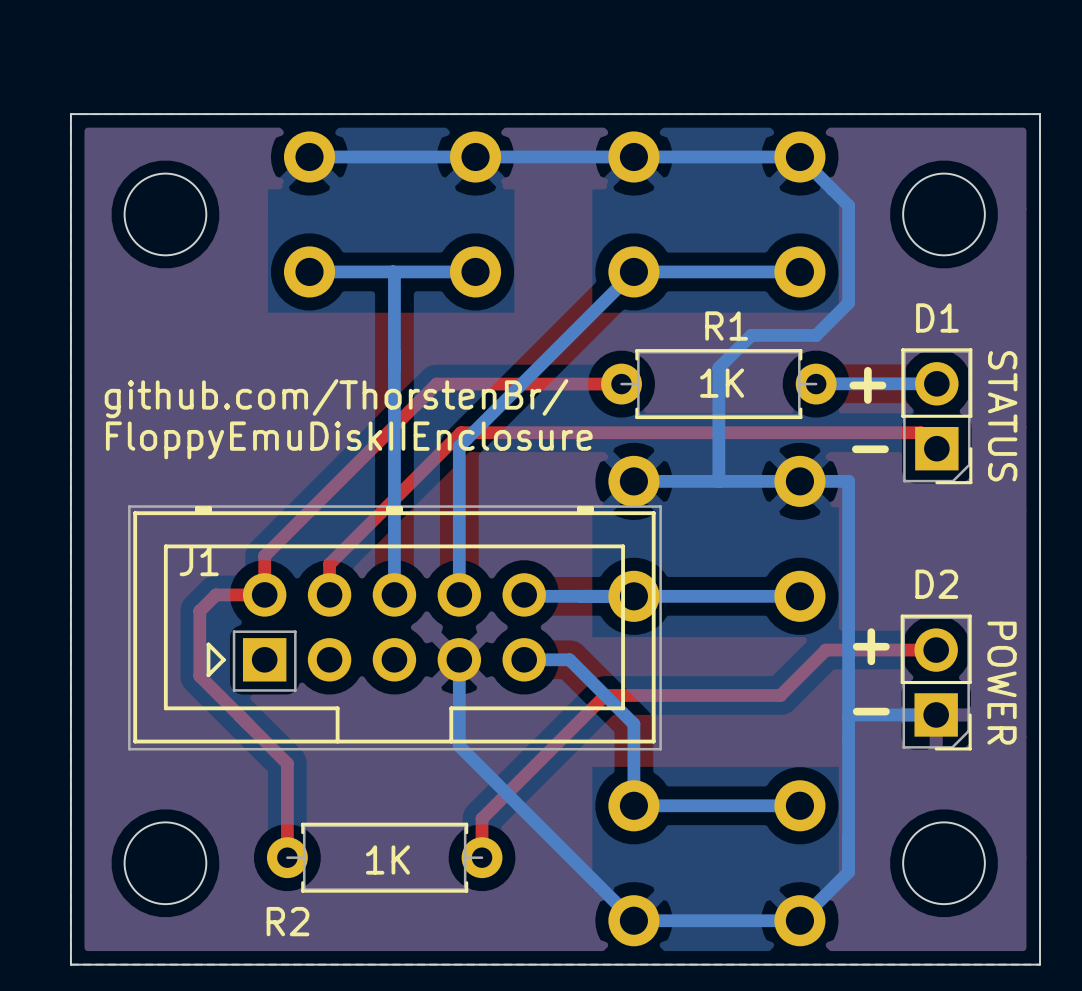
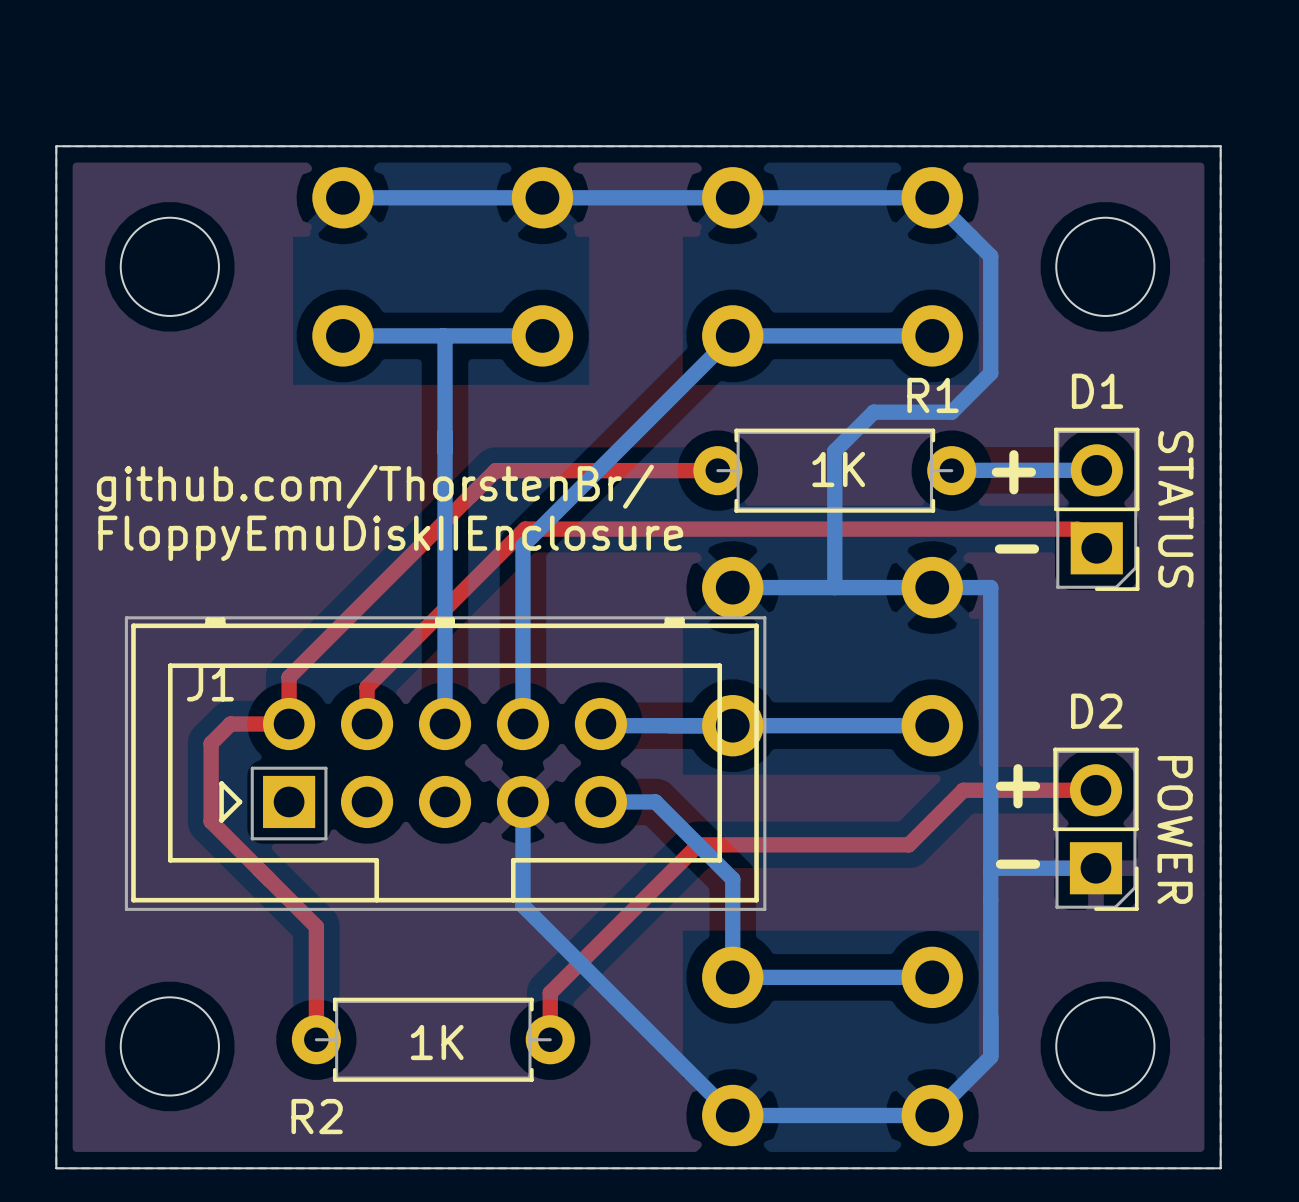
R1 name position: R1 (726, 326) -> R1 (932, 395)

